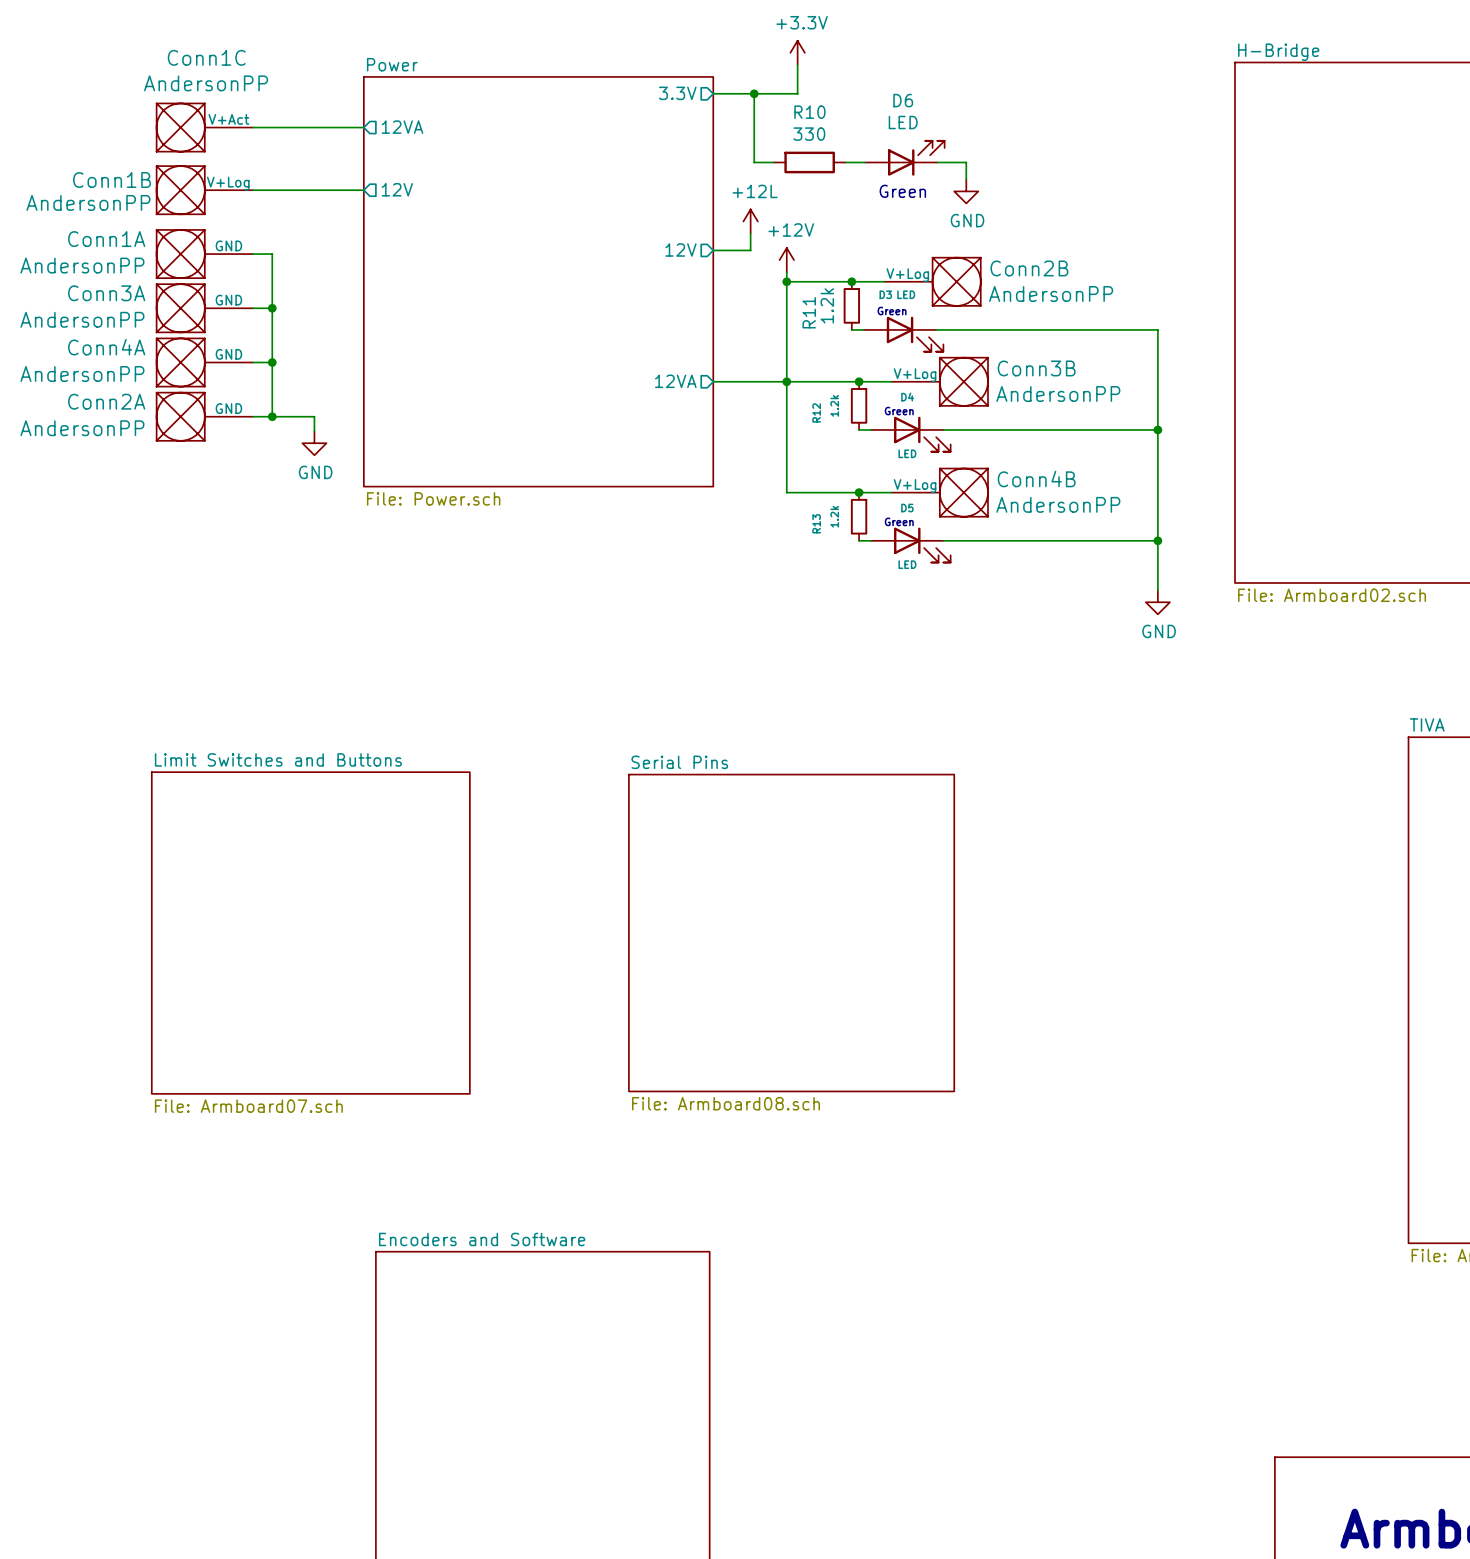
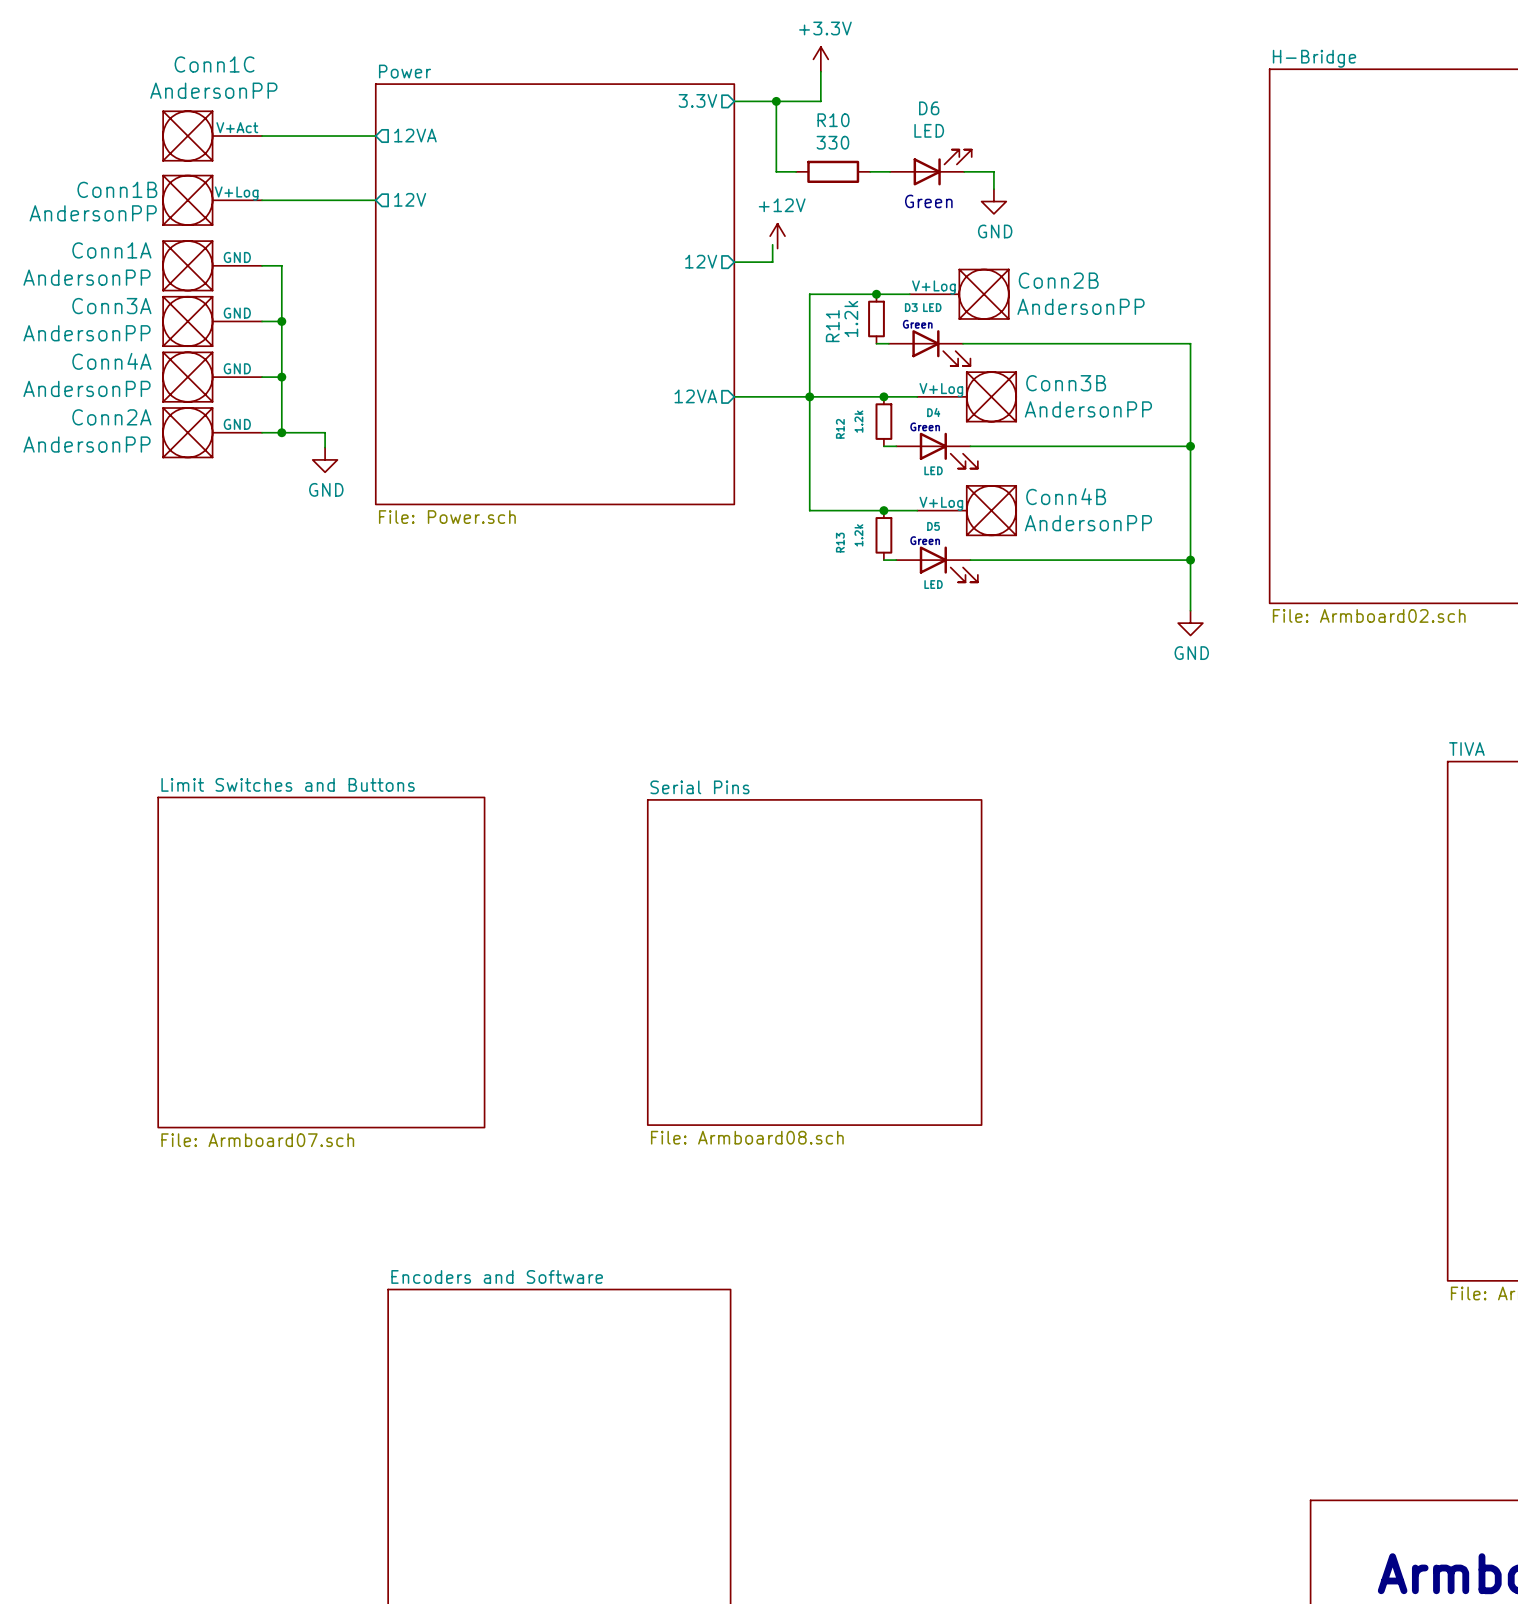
power symbol: +12L (750, 221) -> +12V (777, 236)
power symbol: +12V (786, 260) -> none
wire: (786, 272) (786, 281) -> none
junction: (786, 281) -> none

